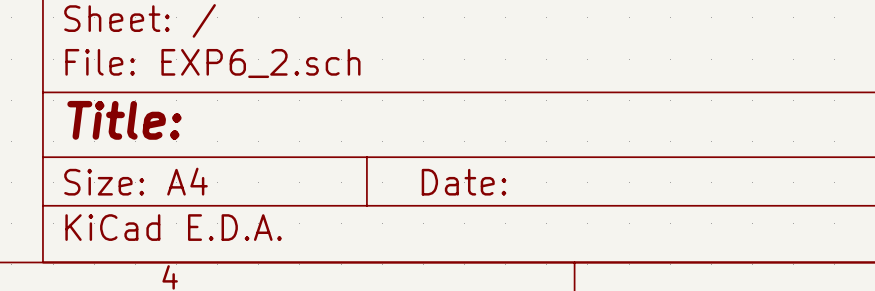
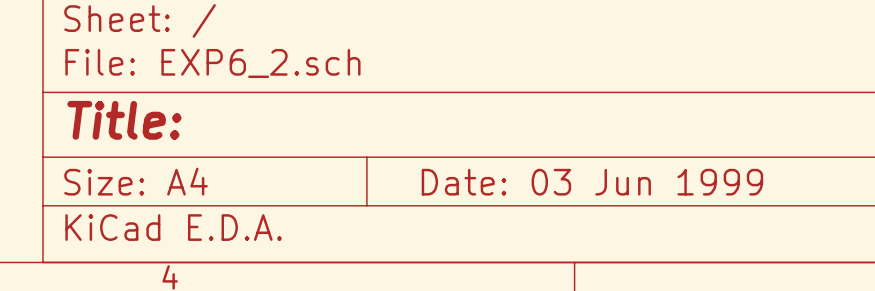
title block: Date: (464, 182) -> Date: 03 Jun 1999 (592, 182)

